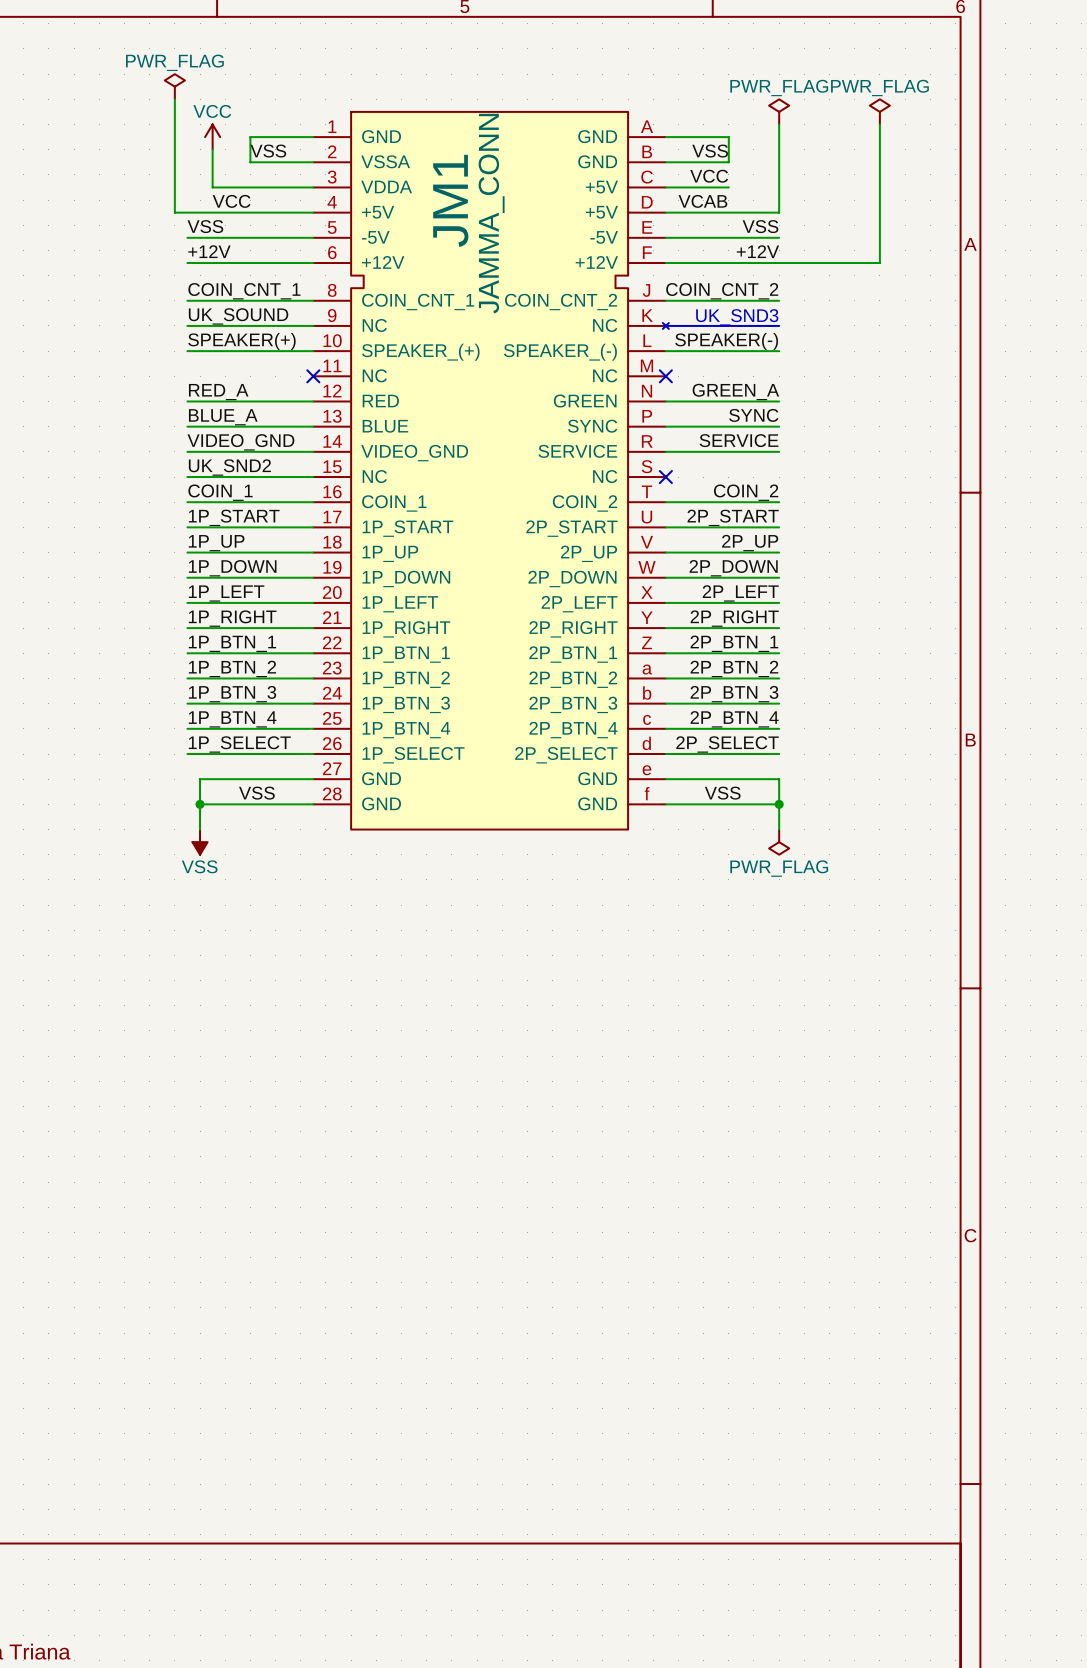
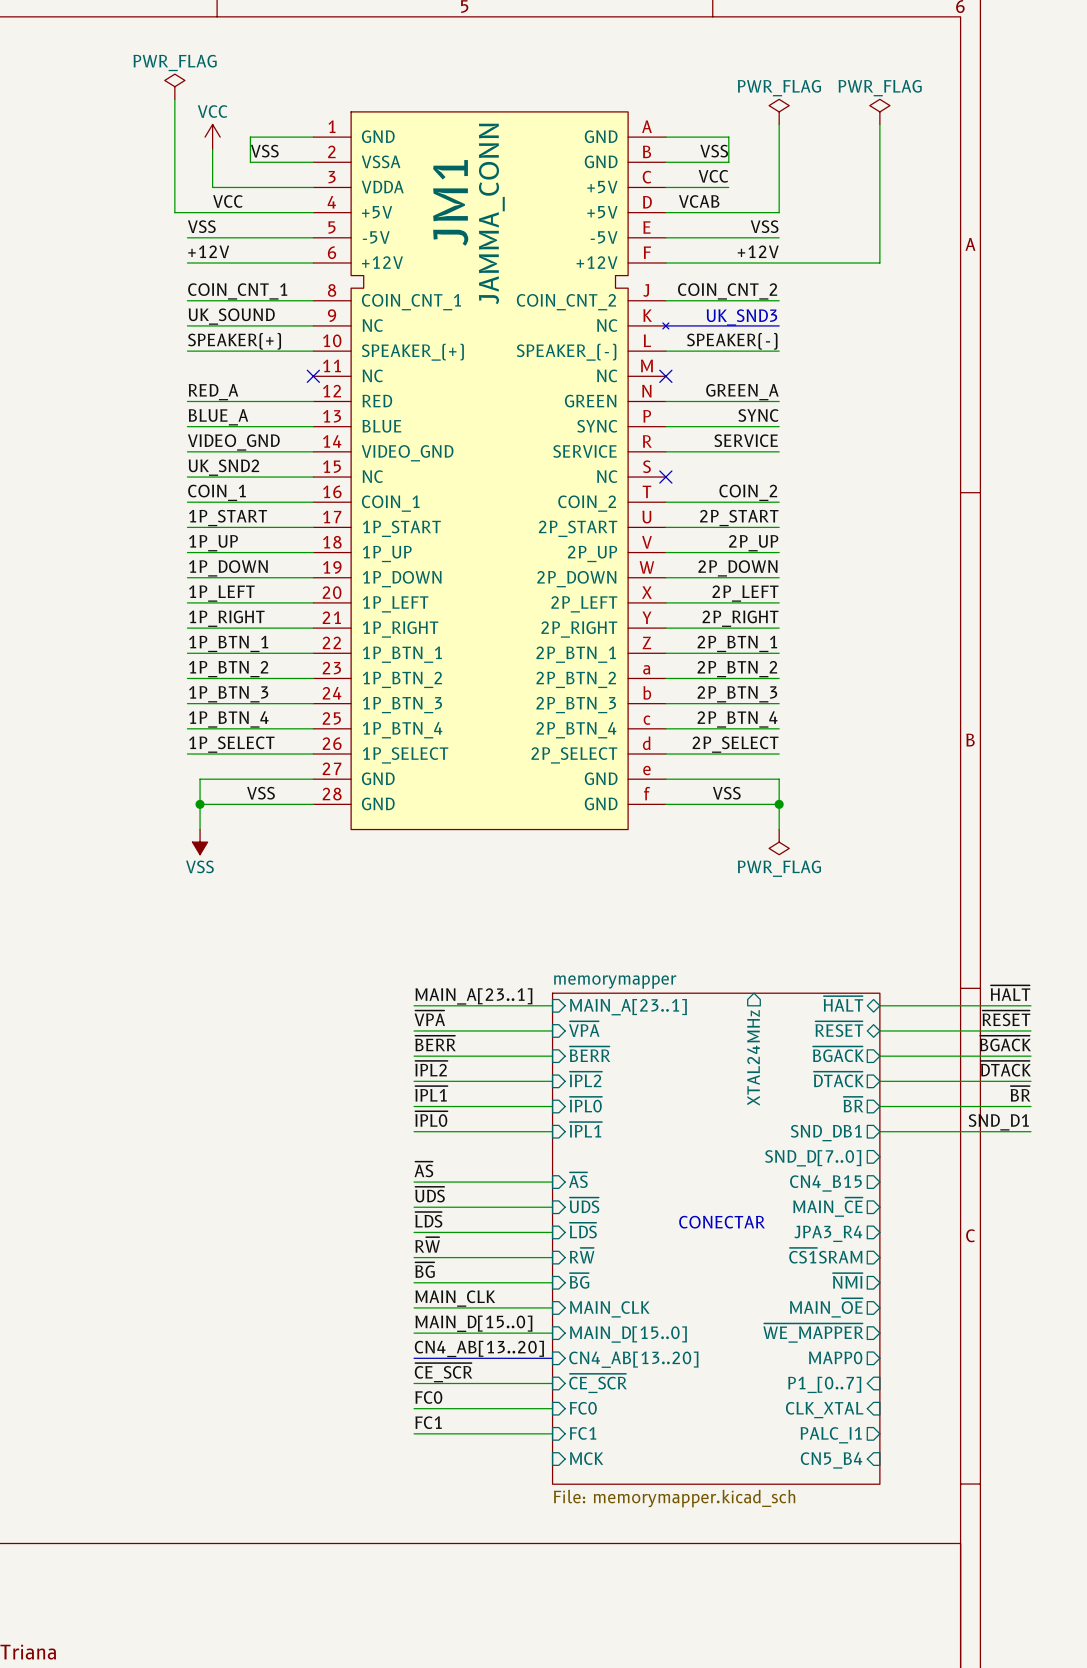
label: none -> ~{HALT} (1010, 993)
label: none -> MAIN_A[23..1] (474, 996)
sheet pin: none -> ~{HALT} (843, 1003)
wire: none -> (414, 1005) (552, 1005)
wire: none -> (879, 1005) (1030, 1005)
sheet pin: none -> MAIN_A[23..1] (628, 1007)
label: none -> ~{VPA} (429, 1018)
label: none -> ~{RESET} (1006, 1018)
sheet pin: none -> ~{VPA} (584, 1029)
sheet pin: none -> ~{RESET} (839, 1029)
wire: none -> (414, 1030) (552, 1030)
wire: none -> (879, 1030) (1030, 1030)
label: none -> ~{BERR} (435, 1043)
label: none -> ~{BGACK} (1005, 1043)
sheet pin: none -> ~{BERR} (590, 1054)
sheet pin: none -> ~{BGACK} (838, 1054)
wire: none -> (414, 1056) (552, 1056)
wire: none -> (879, 1056) (1030, 1056)
sheet pin: none -> XTAL24MHz (753, 1057)
label: none -> ~{IPL2} (431, 1068)
label: none -> ~{DTACK} (1005, 1068)
sheet pin: none -> ~{IPL2} (585, 1079)
sheet pin: none -> ~{DTACK} (838, 1079)
wire: none -> (414, 1081) (552, 1081)
wire: none -> (879, 1081) (1030, 1081)
label: none -> ~{IPL1} (431, 1093)
label: none -> ~{BR} (1020, 1093)
sheet pin: none -> ~{IPL0} (585, 1104)
sheet pin: none -> ~{BR} (853, 1104)
wire: none -> (414, 1106) (552, 1106)
wire: none -> (879, 1106) (1030, 1106)
label: none -> ~{IPL0} (431, 1119)
label: none -> SND_D1 (998, 1122)
sheet pin: none -> ~{IPL1} (585, 1129)
wire: none -> (414, 1131) (552, 1131)
wire: none -> (879, 1131) (1030, 1131)
sheet pin: none -> SND_DB1 (826, 1133)
sheet pin: none -> SND_D[7..0] (813, 1158)
label: none -> ~{AS} (423, 1169)
sheet pin: none -> ~{AS} (578, 1180)
wire: none -> (414, 1182) (552, 1182)
sheet pin: none -> CN4_B15 (825, 1183)
label: none -> ~{UDS} (430, 1194)
sheet pin: none -> ~{UDS} (584, 1205)
wire: none -> (414, 1207) (552, 1207)
sheet pin: none -> MAIN_~{CE} (827, 1207)
label: none -> ~{LDS} (428, 1219)
text: none -> CONECTAR (722, 1222)
sheet pin: none -> ~{LDS} (583, 1230)
wire: none -> (414, 1232) (552, 1232)
sheet pin: none -> JPA3_R4 (828, 1233)
sheet memorymapper: none -> File: memorymapper.kicad_sch (716, 1238)
label: none -> R~{W} (427, 1244)
sheet pin: none -> R~{W} (582, 1255)
sheet pin: none -> ~{CS1}SRAM (825, 1255)
wire: none -> (414, 1257) (552, 1257)
label: none -> ~{BG} (425, 1270)
sheet pin: none -> ~{BG} (579, 1280)
sheet pin: none -> ~{NMI} (847, 1280)
wire: none -> (414, 1282) (552, 1282)
label: none -> MAIN_CLK (455, 1298)
wire: none -> (414, 1307) (552, 1307)
sheet pin: none -> MAIN_~{OE} (826, 1307)
sheet pin: none -> MAIN_CLK (609, 1309)
label: none -> MAIN_D[15..0] (474, 1323)
wire: none -> (414, 1333) (552, 1333)
sheet pin: none -> ~{WE_MAPPER} (813, 1333)
sheet pin: none -> MAIN_D[15..0] (628, 1334)
label: none -> CN4_AB[13..20] (479, 1348)
sheet pin: none -> MAPP0 (835, 1357)
bus: none -> (414, 1358) (552, 1358)
sheet pin: none -> CN4_AB[13..20] (633, 1359)
label: none -> ~{CE_SCR} (443, 1372)
wire: none -> (414, 1383) (552, 1383)
sheet pin: none -> ~{CE_SCR} (598, 1383)
sheet pin: none -> P1_[0..7] (824, 1384)
label: none -> FC0 (428, 1397)
wire: none -> (414, 1408) (552, 1408)
sheet pin: none -> FC0 (583, 1408)
sheet pin: none -> CLK_XTAL (824, 1410)
label: none -> FC1 (428, 1422)
wire: none -> (414, 1433) (552, 1433)
sheet pin: none -> FC1 (583, 1433)
sheet pin: none -> PALC_I1 (831, 1435)
sheet pin: none -> MCK (586, 1458)
sheet pin: none -> CN5_B4 (831, 1460)

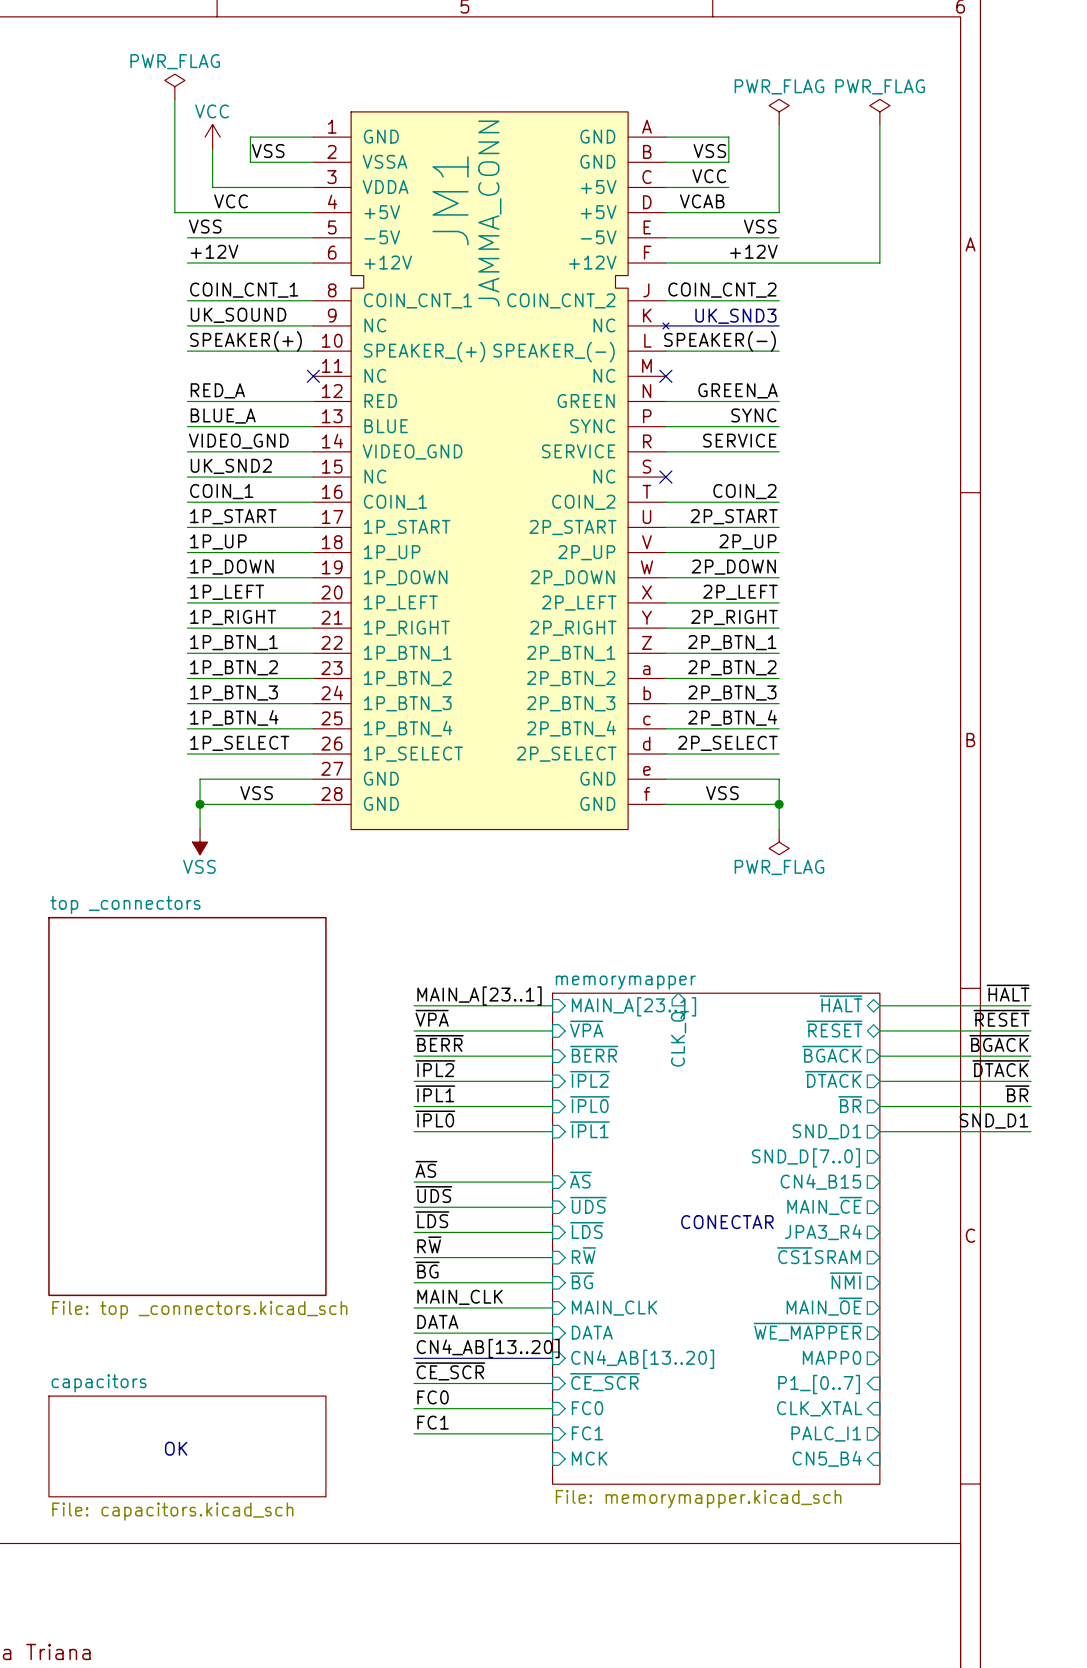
sheet pin: none -> CLK_Q (678, 1038)
sheet pin: XTAL24MHz (753, 1057) -> none
sheet top _connectors: none -> File: top _connectors.kicad_sch (187, 1106)
sheet pin: SND_DB1 (826, 1133) -> SND_D1 (826, 1131)
label: MAIN_D[15..0] (474, 1323) -> DATA (437, 1321)
sheet pin: MAIN_D[15..0] (628, 1334) -> DATA (592, 1332)
sheet capacitors: none -> File: capacitors.kicad_sch (187, 1446)
text: none -> OK (176, 1448)

